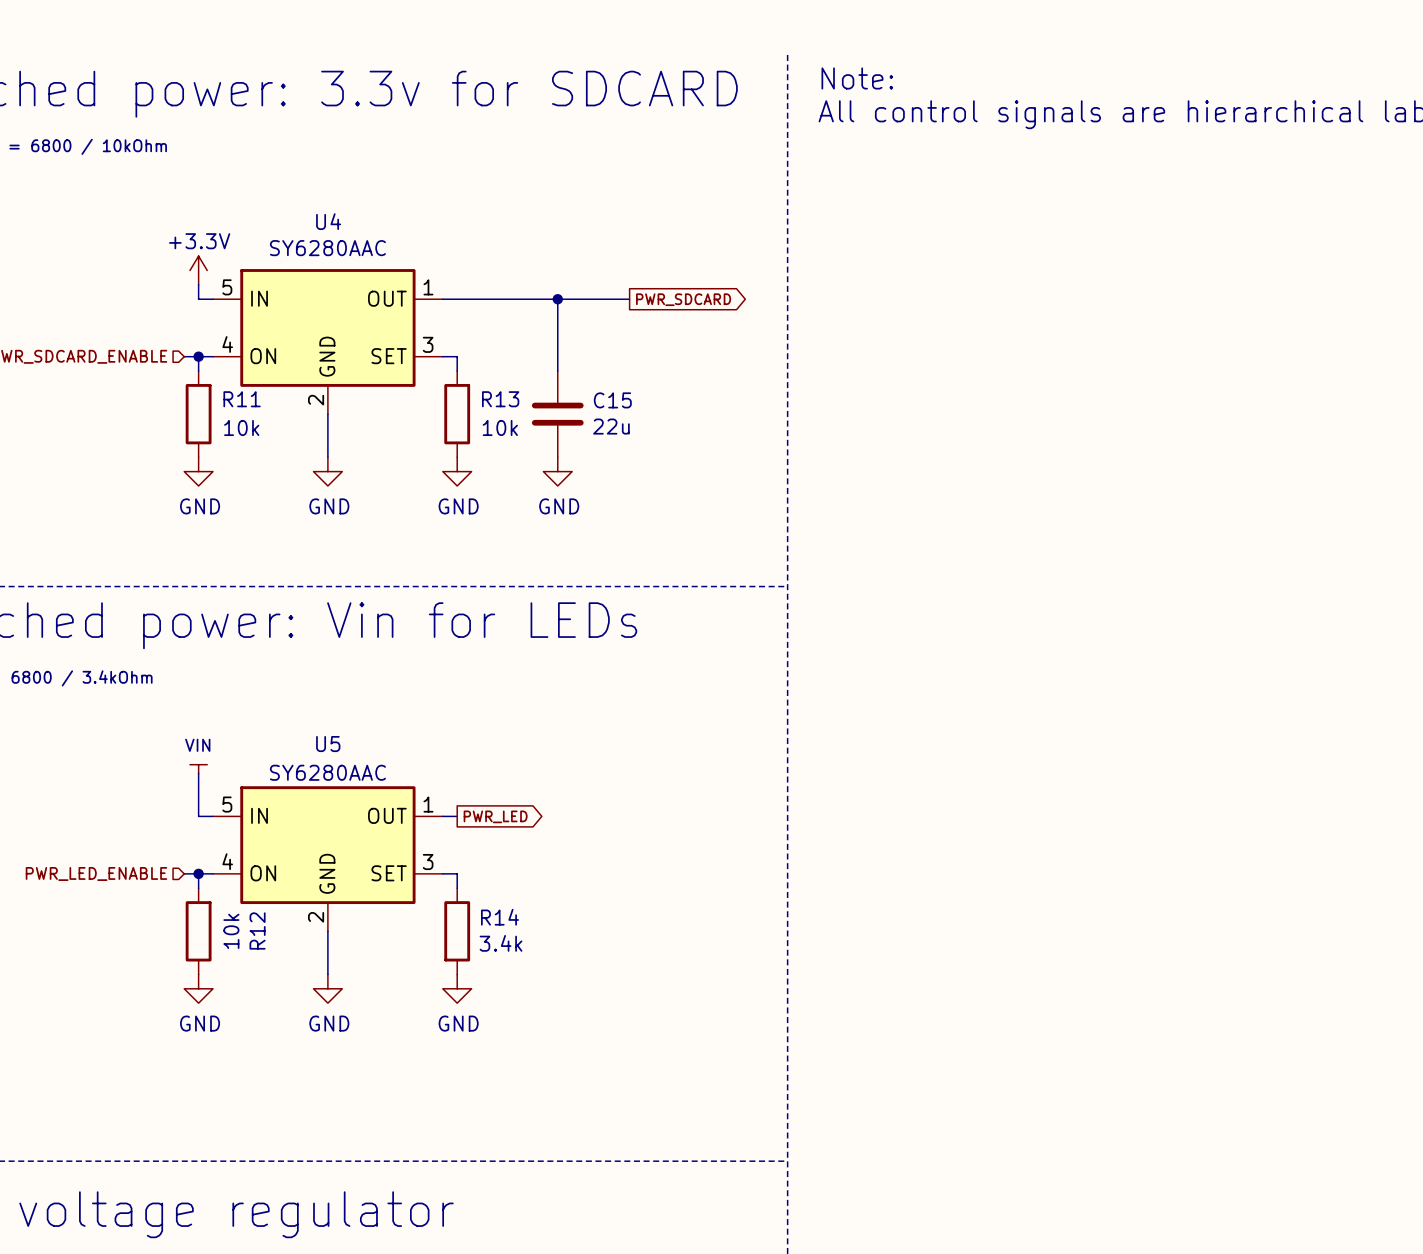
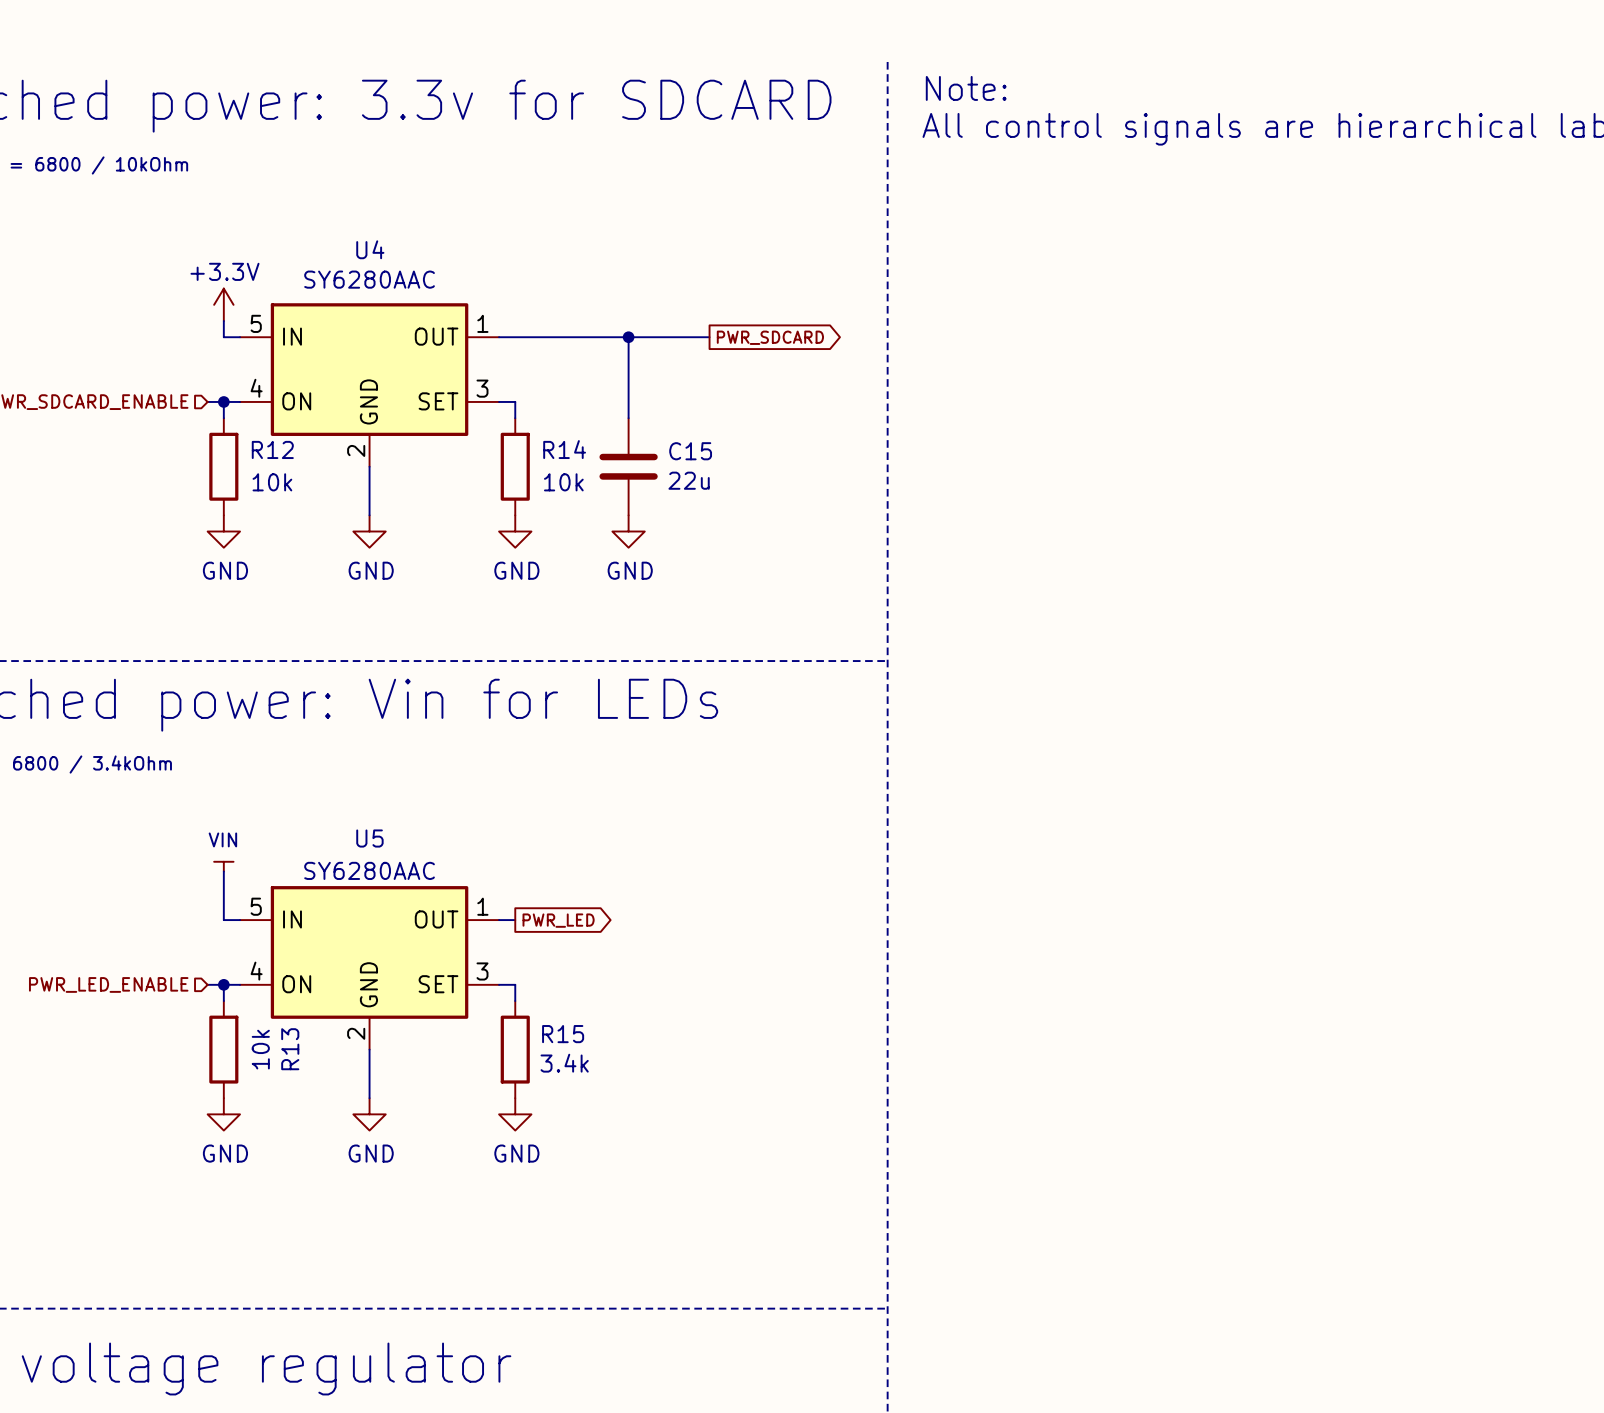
R11 name: R11 (242, 399) -> R12 (272, 449)
R13 name: R13 (500, 399) -> R14 (564, 449)
R14 name: R14 (500, 917) -> R15 (563, 1034)
R12 name: R12 (257, 930) -> R13 (290, 1049)

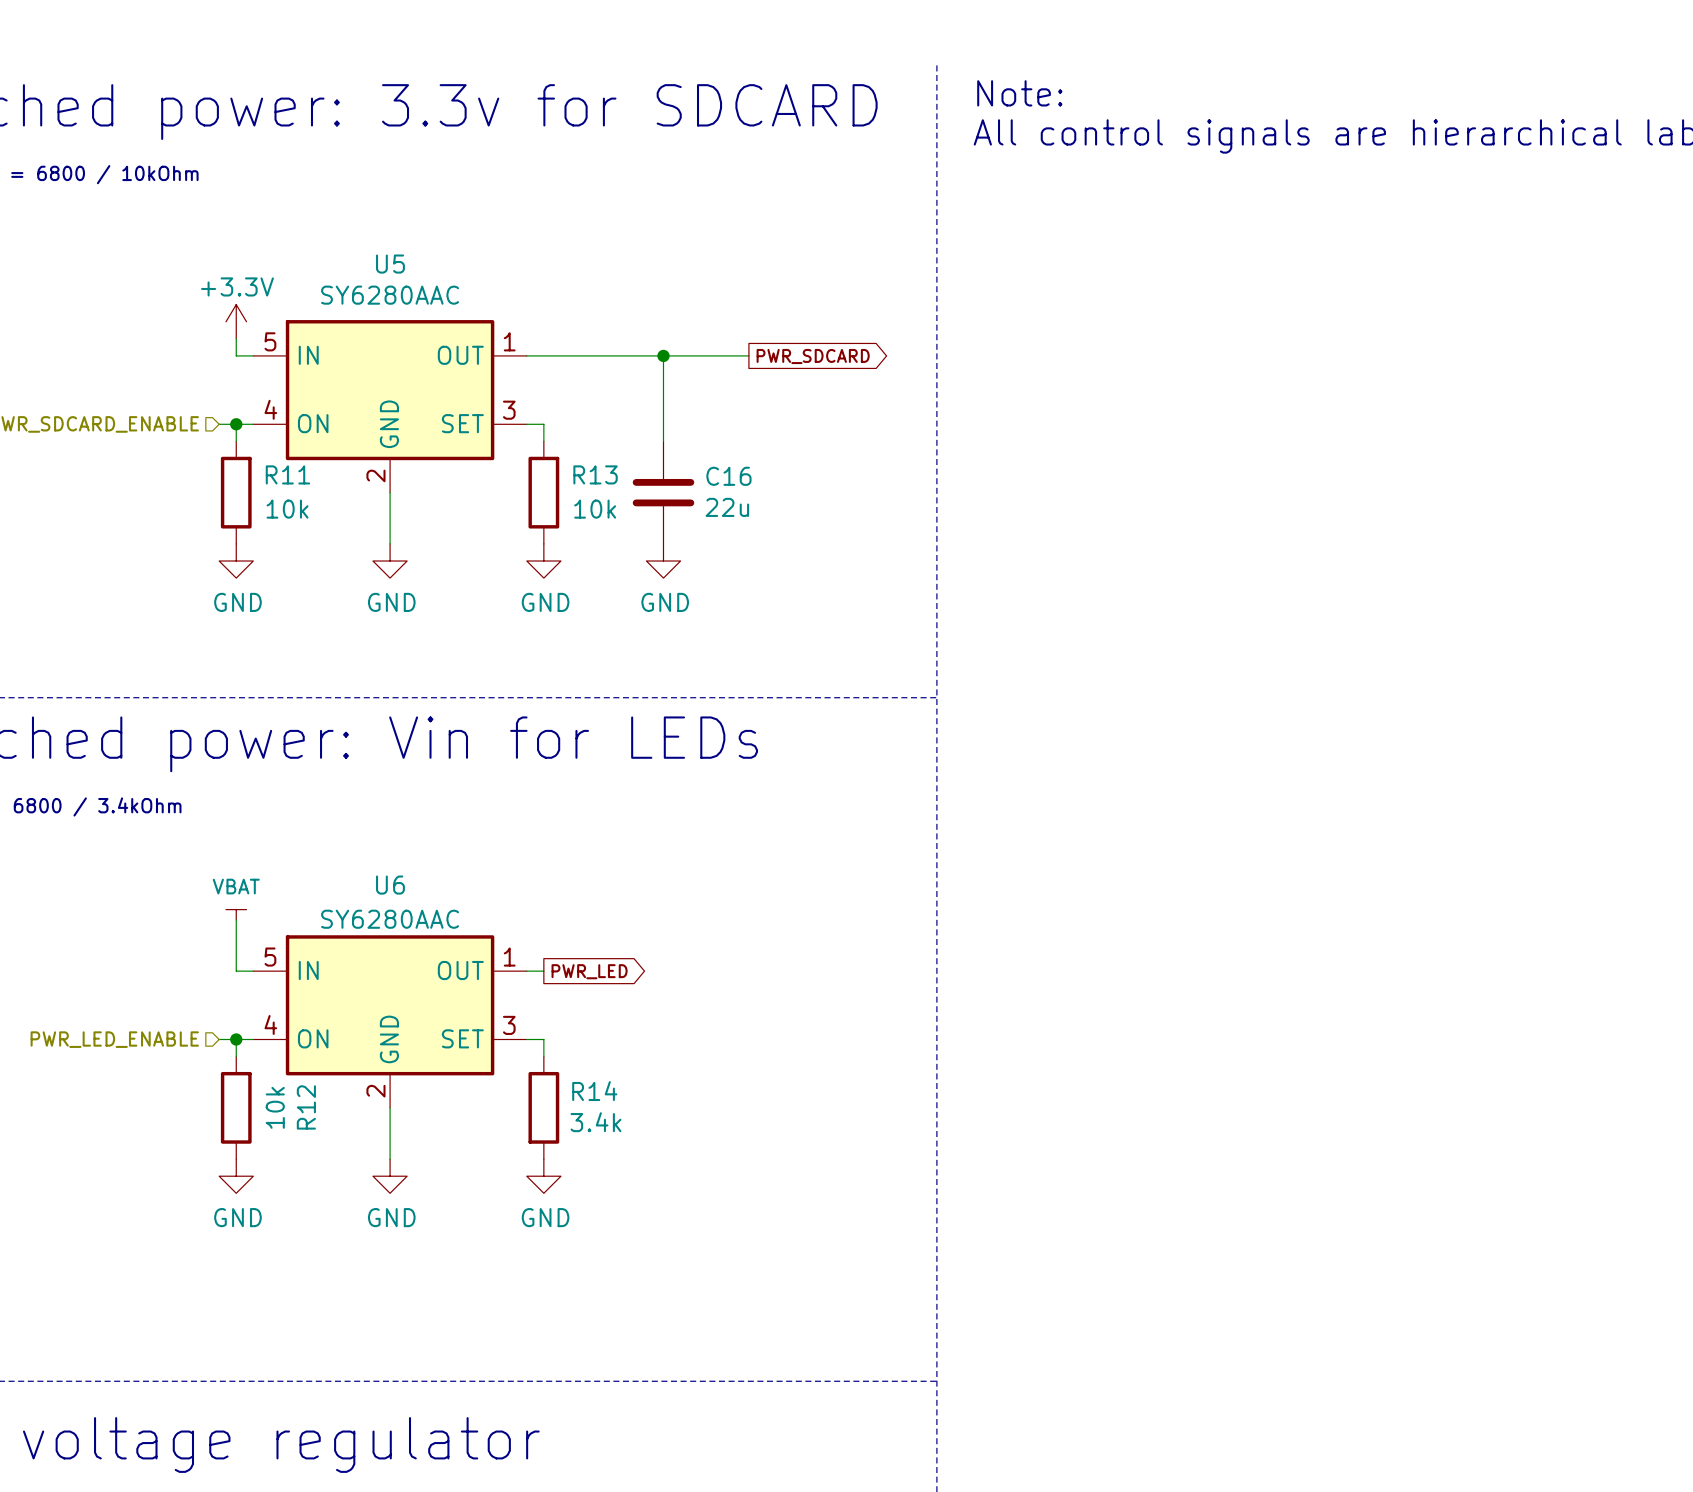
U4 name: U4 (370, 249) -> U5 (390, 264)
R12 name: R12 (272, 449) -> R11 (287, 474)
R14 name: R14 (564, 449) -> R13 (595, 474)
C15 name: C15 (690, 451) -> C16 (728, 476)
U5 name: U5 (369, 838) -> U6 (390, 885)
power symbol: VIN (223, 866) -> VBAT (236, 914)
R15 name: R15 (563, 1034) -> R14 (594, 1091)
R13 name: R13 (290, 1049) -> R12 (306, 1107)

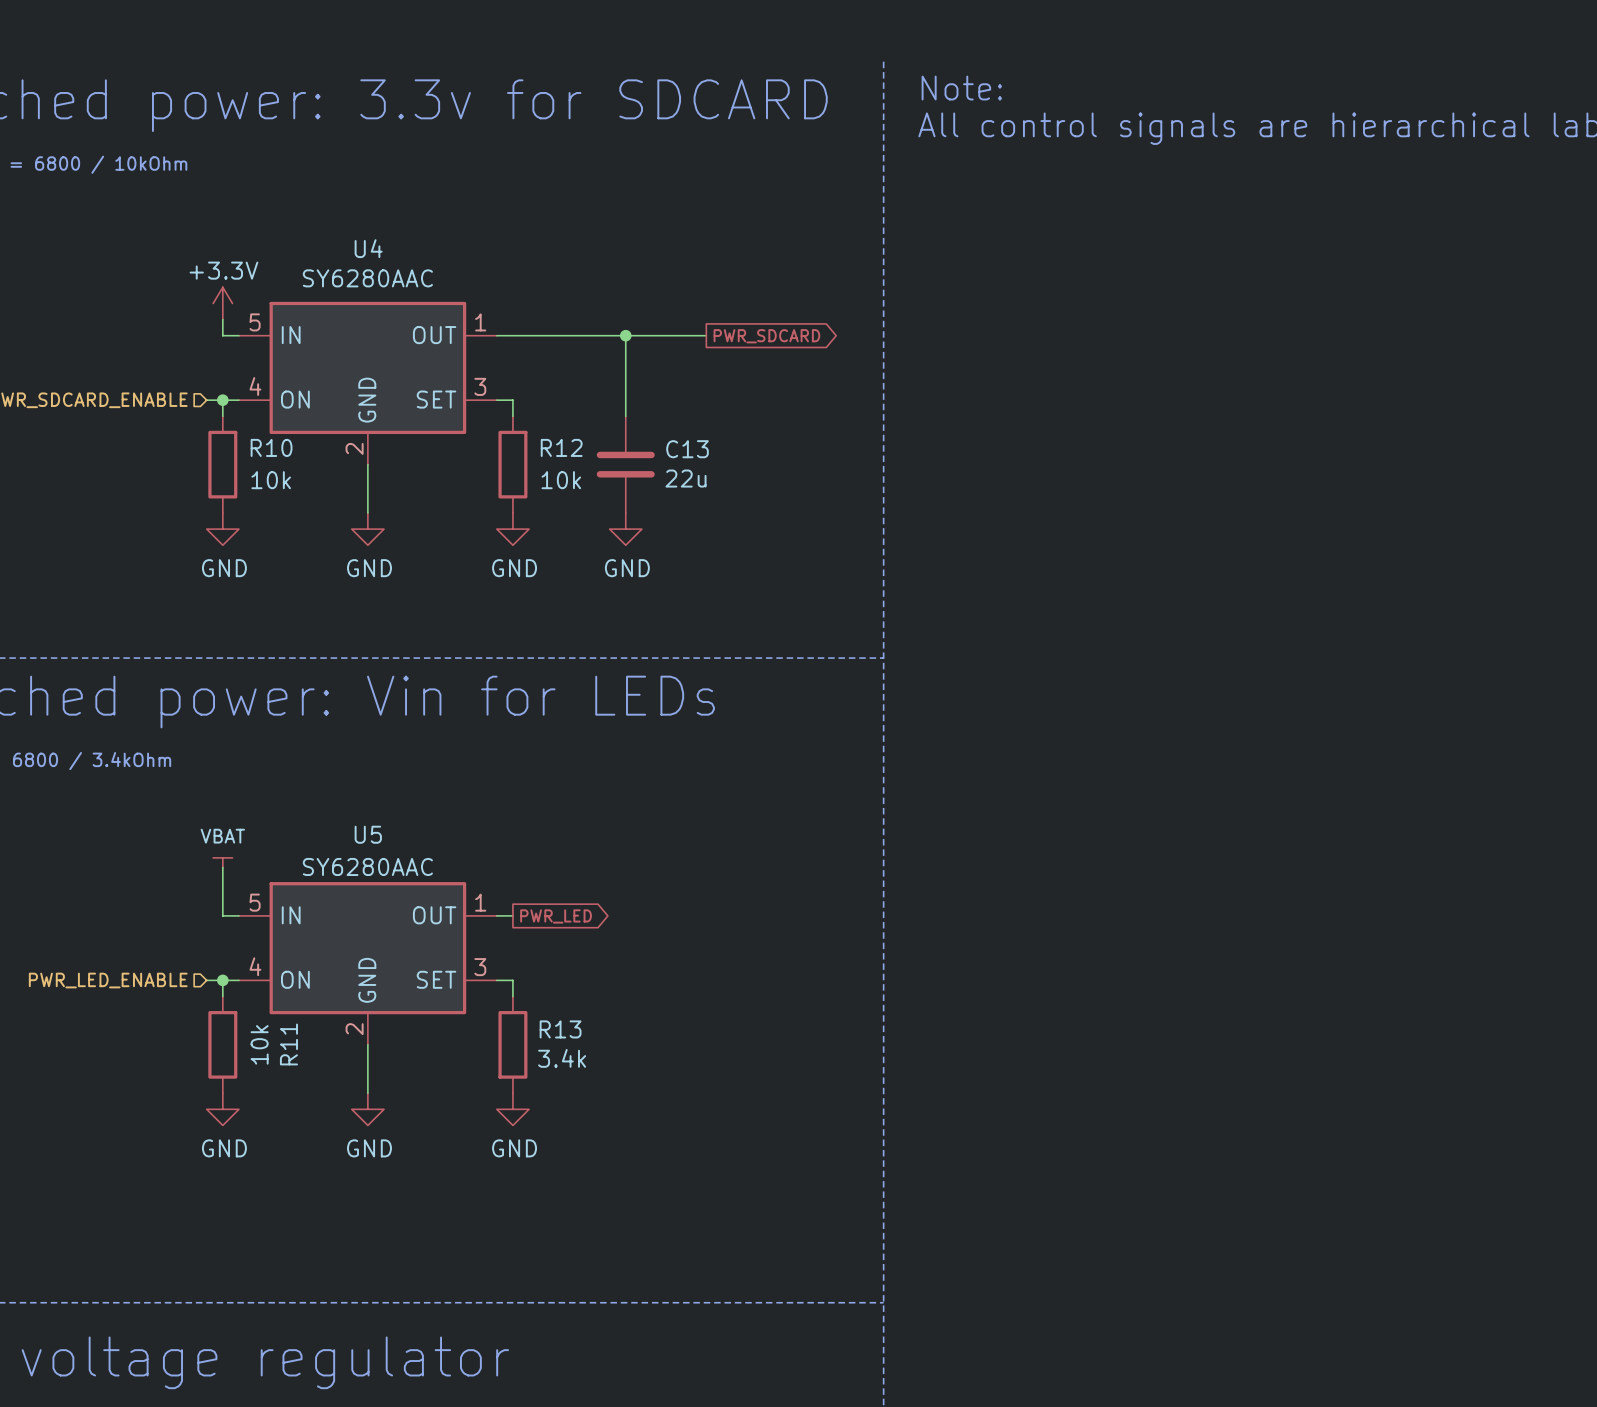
U5 name: U5 (390, 264) -> U4 (368, 248)
R11 name: R11 (287, 474) -> R10 (271, 447)
R13 name: R13 (595, 474) -> R12 (561, 447)
C16 name: C16 (728, 476) -> C13 (687, 449)
U6 name: U6 (390, 885) -> U5 (368, 834)
R14 name: R14 (594, 1091) -> R13 (560, 1029)
R12 name: R12 (306, 1107) -> R11 (288, 1044)

